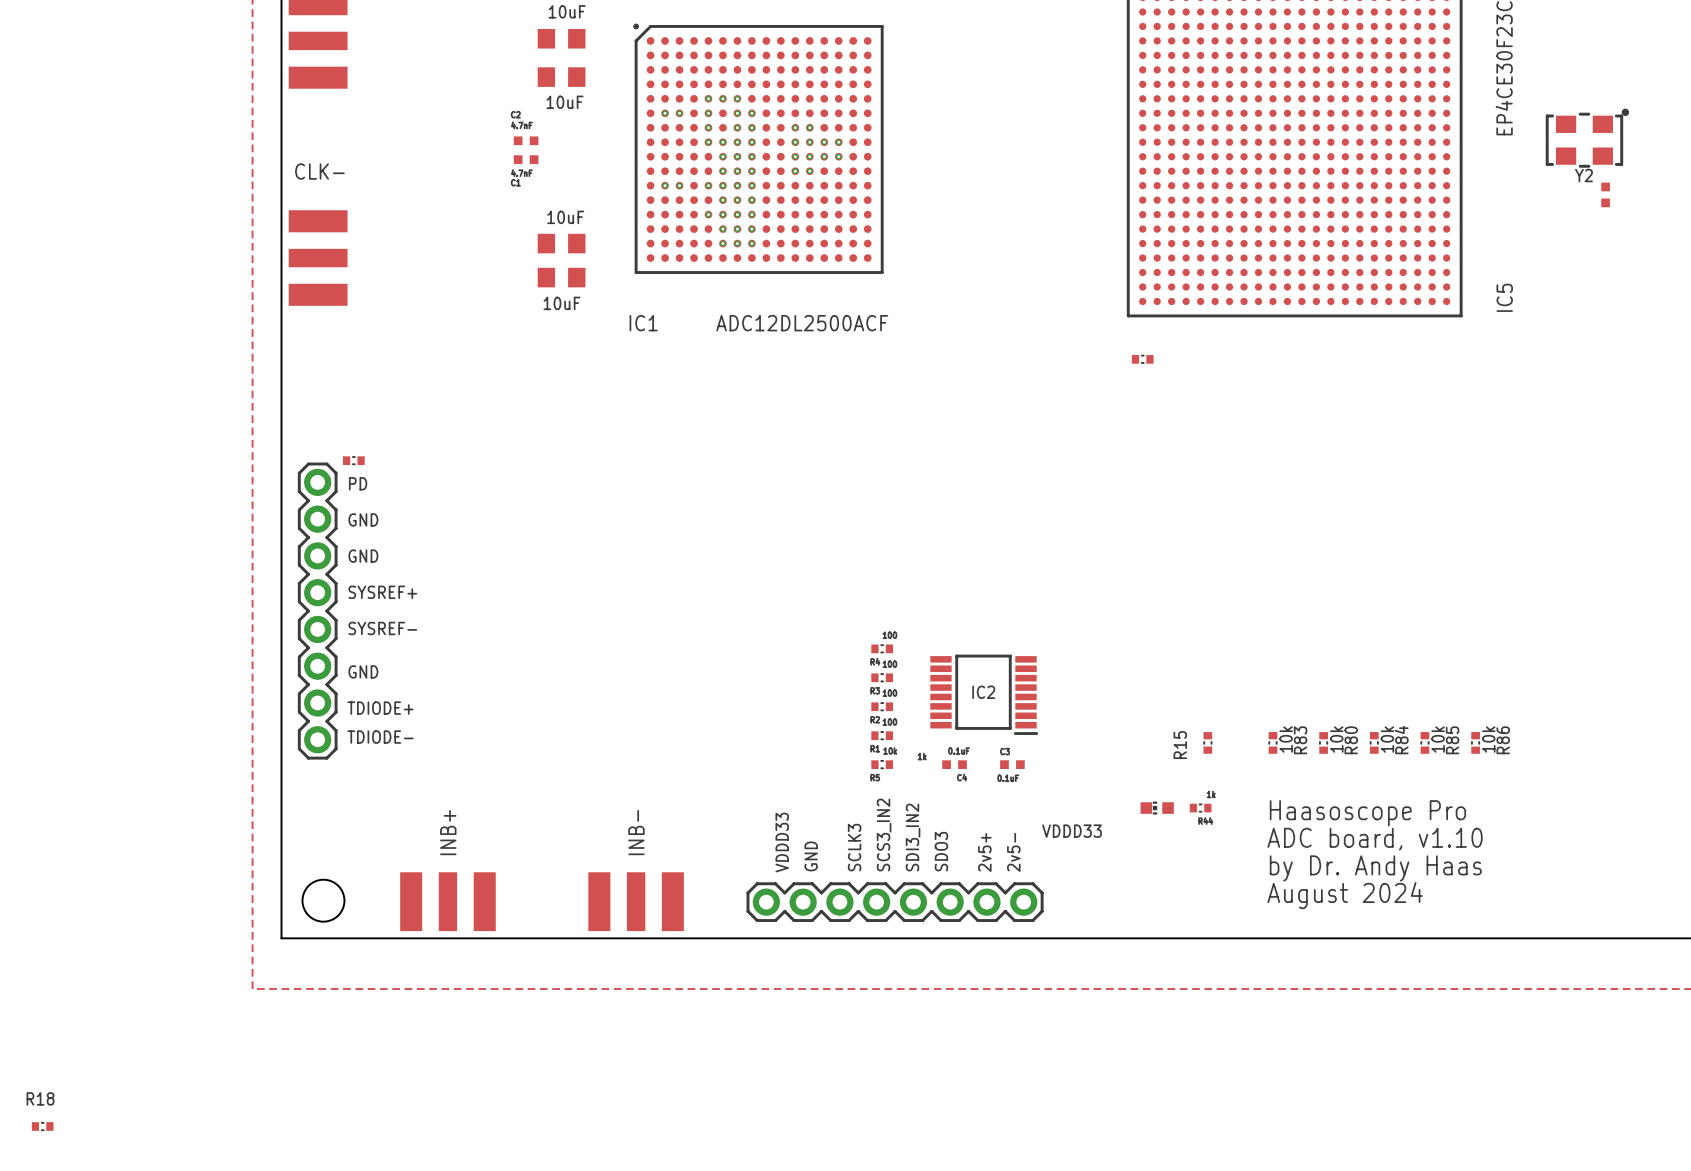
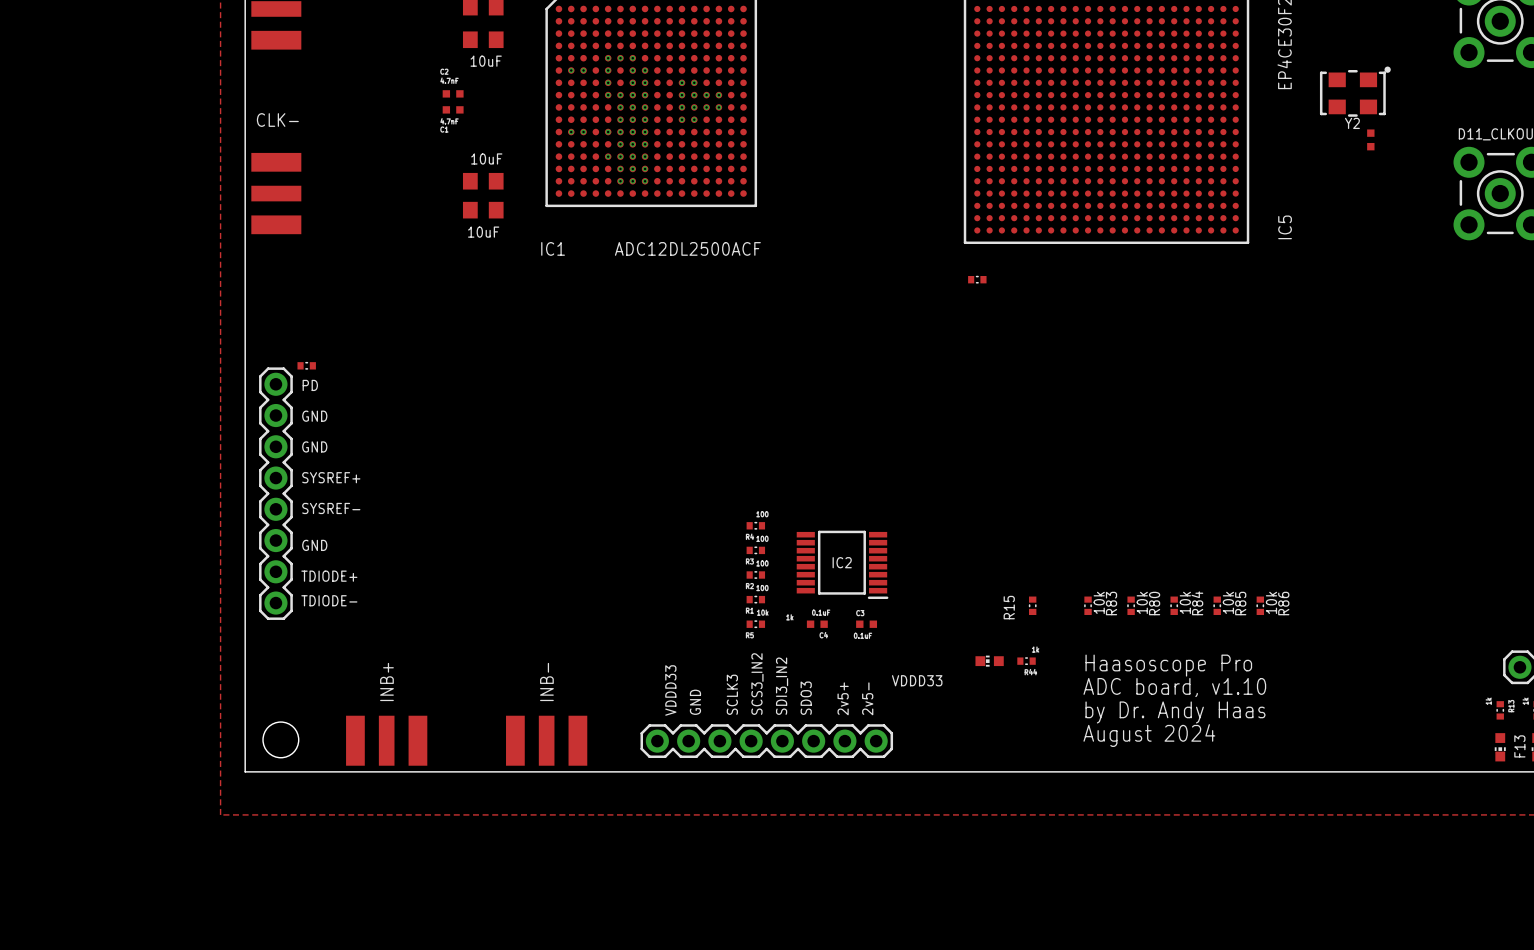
R18: (42, 1126) -> none

